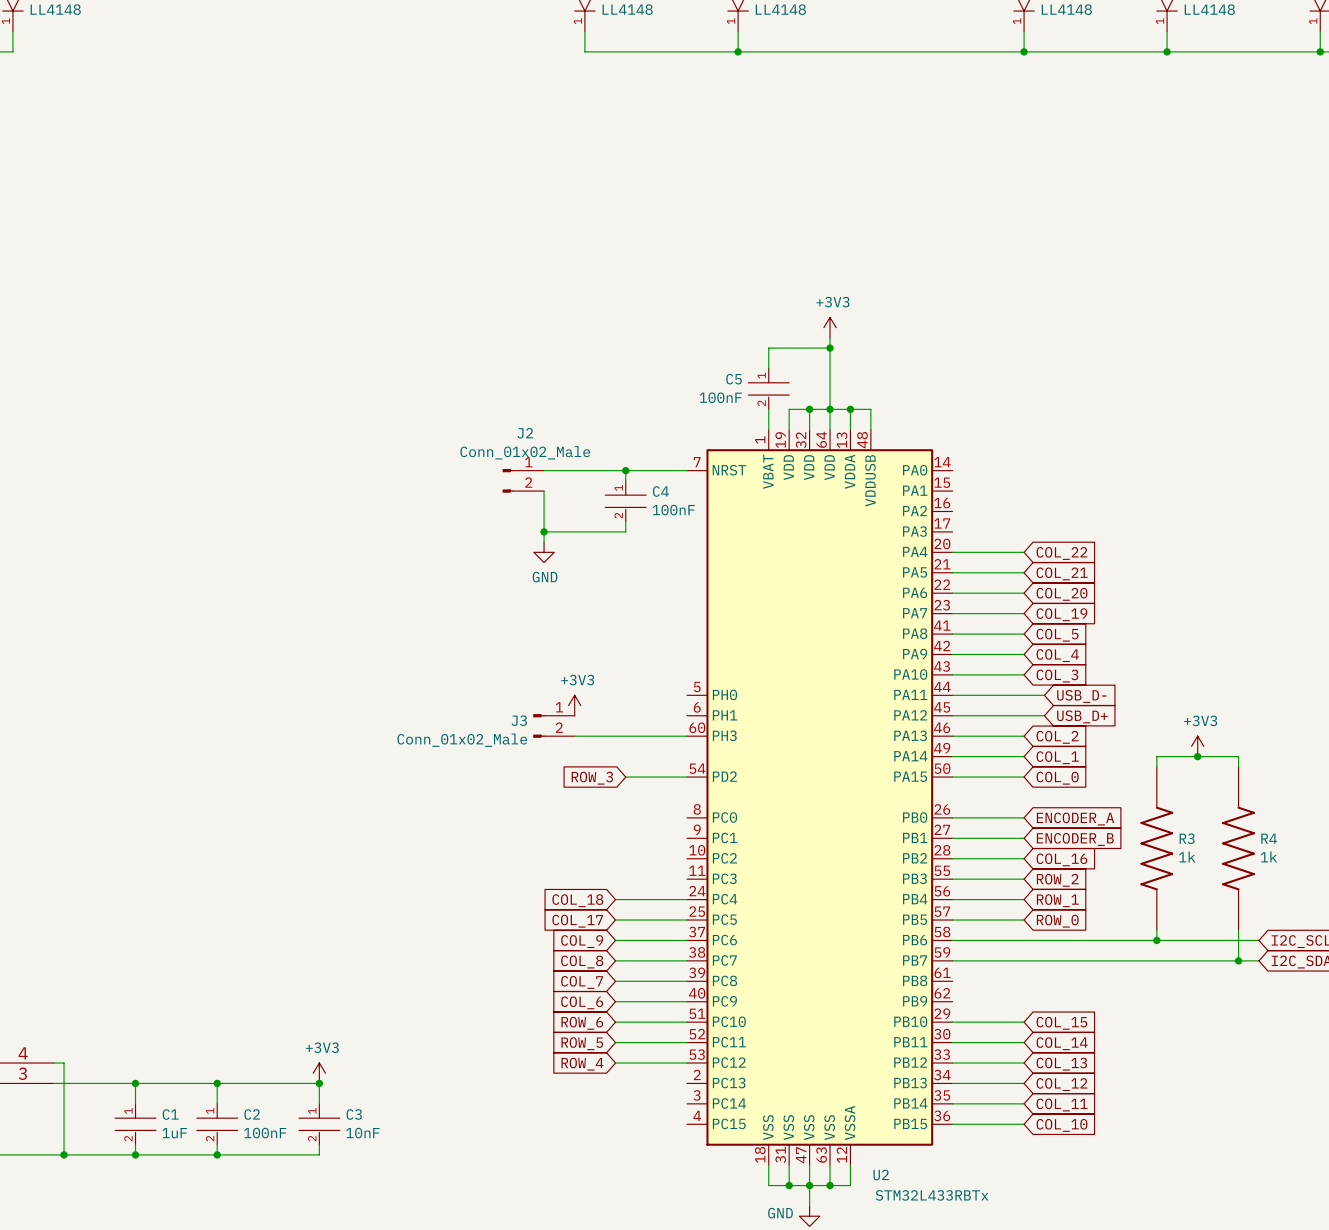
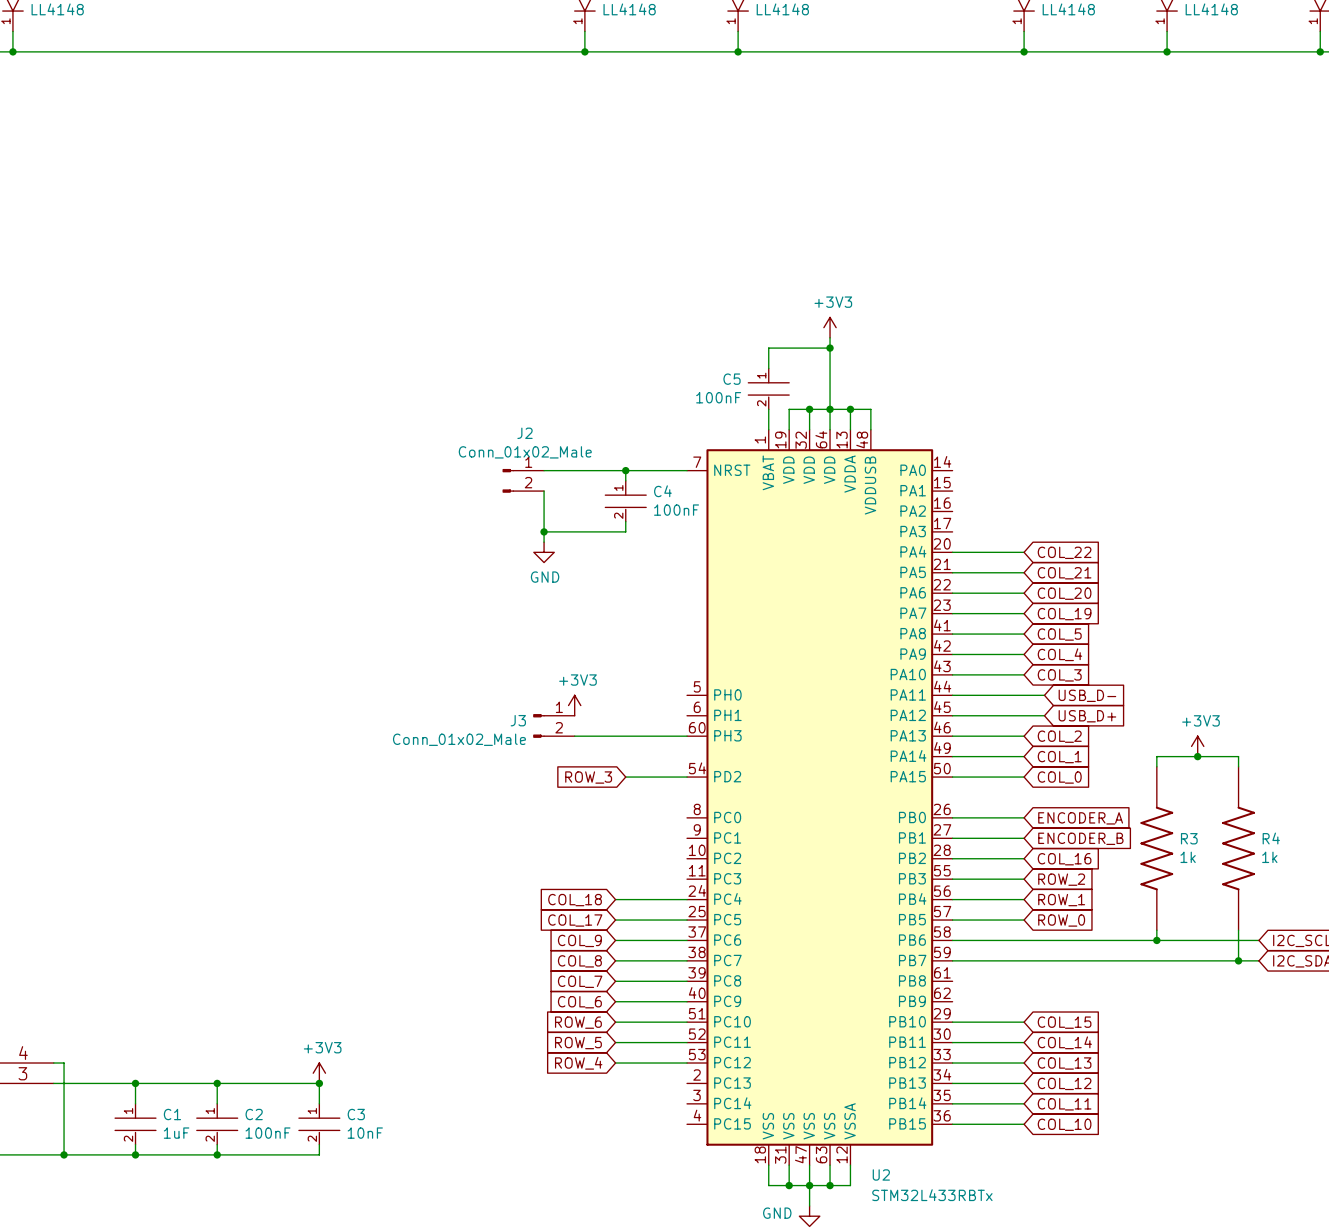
wire: none -> (12, 51) (584, 51)
junction: none -> (12, 51)
junction: none -> (584, 51)

